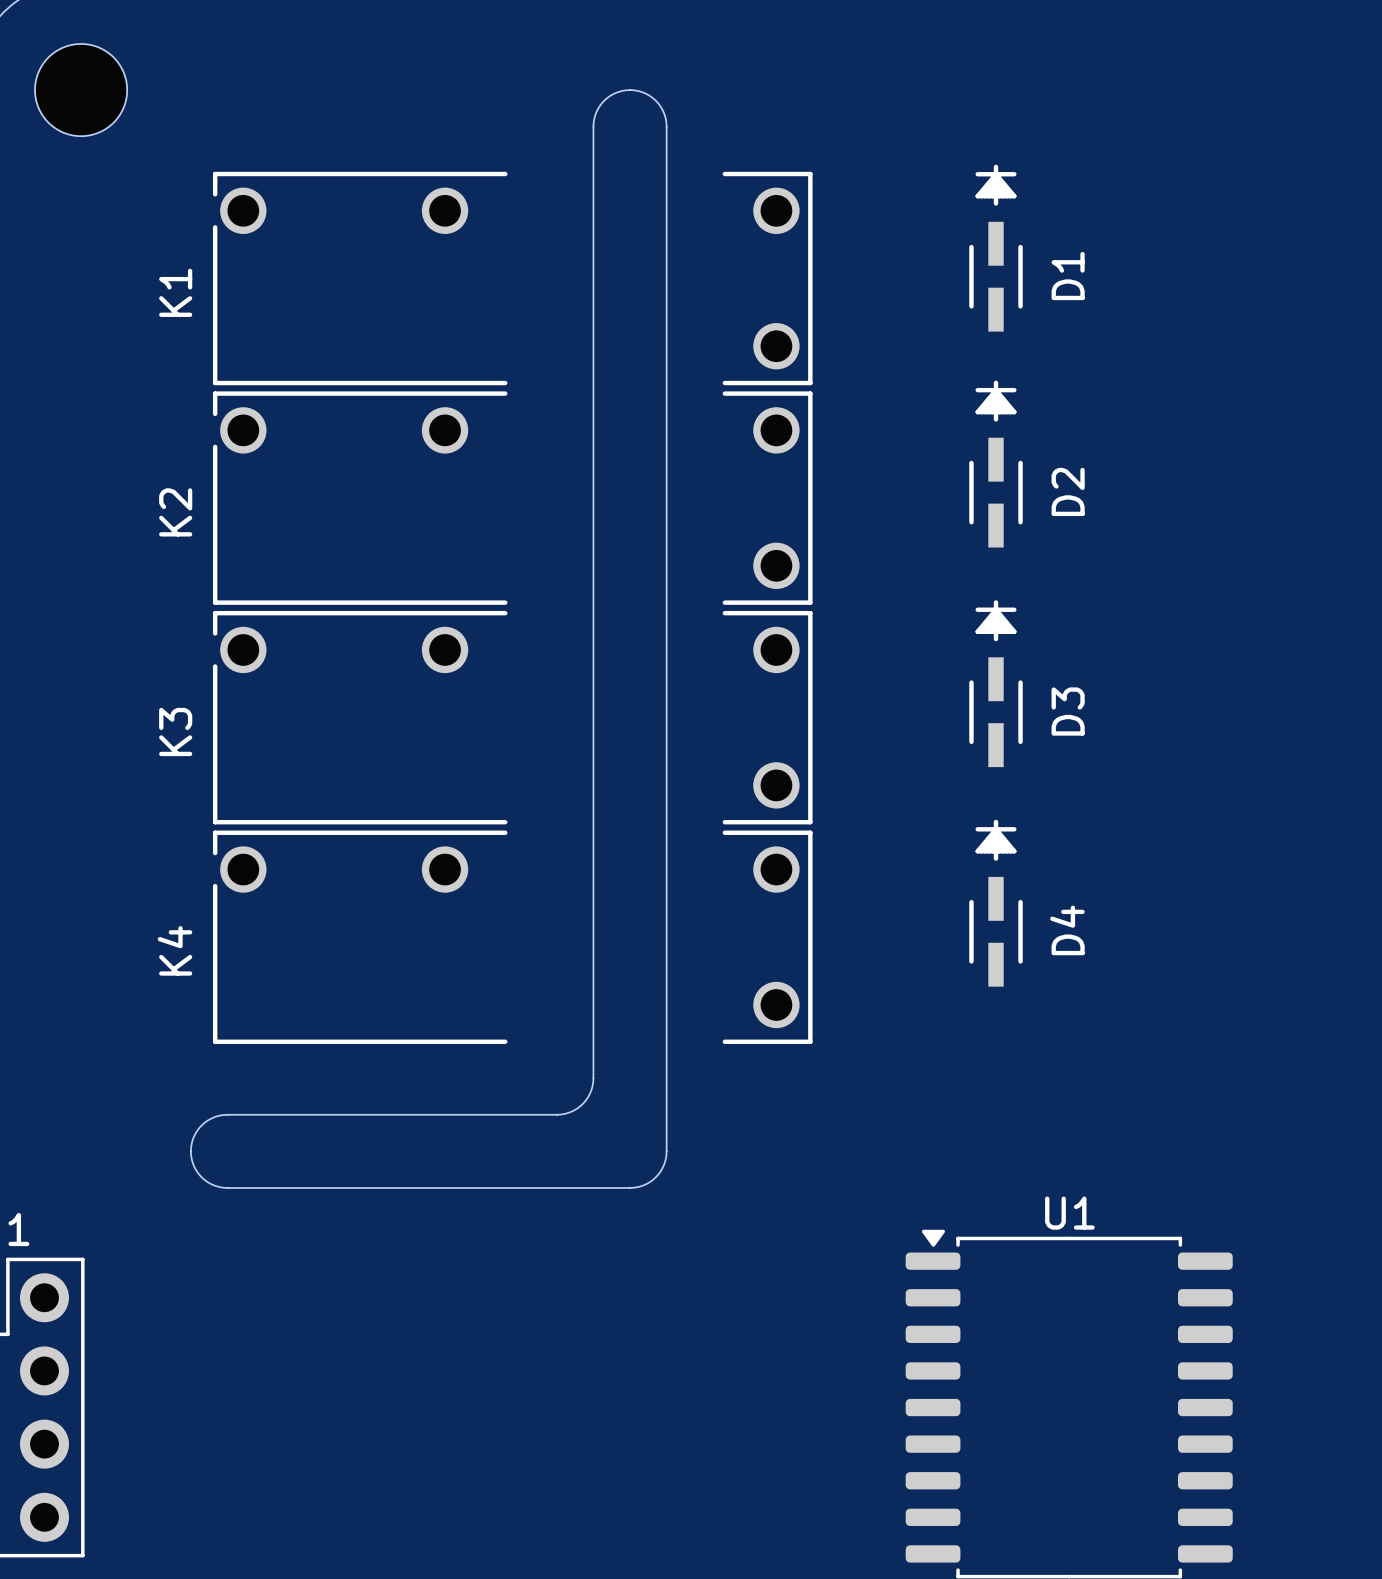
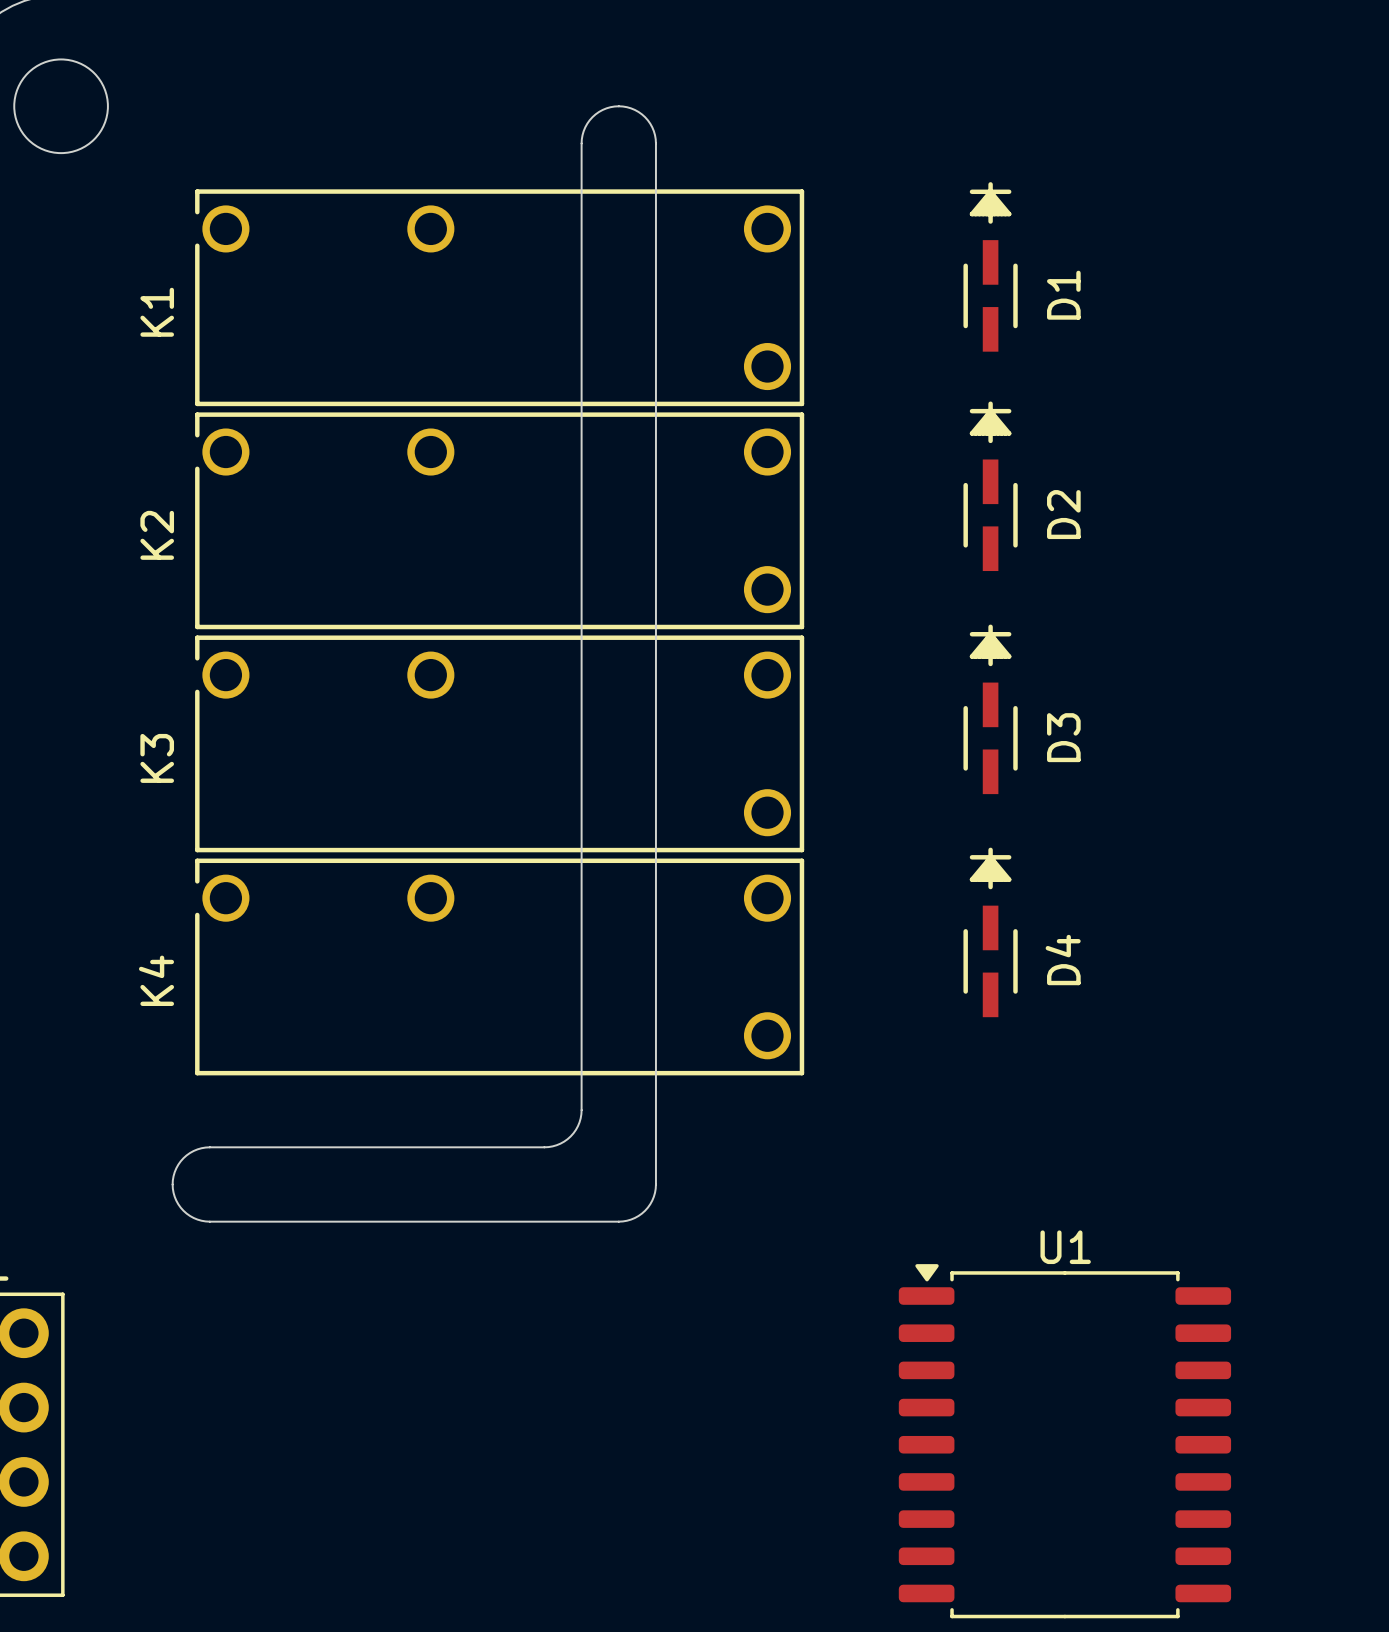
K1 footprint: [212, 171, 813, 386] -> [195, 189, 805, 407]
K2 footprint: [212, 391, 813, 605] -> [195, 412, 805, 630]
K3 footprint: [212, 610, 813, 825] -> [195, 635, 805, 853]
K4 footprint: [212, 830, 813, 1044] -> [195, 858, 805, 1076]

